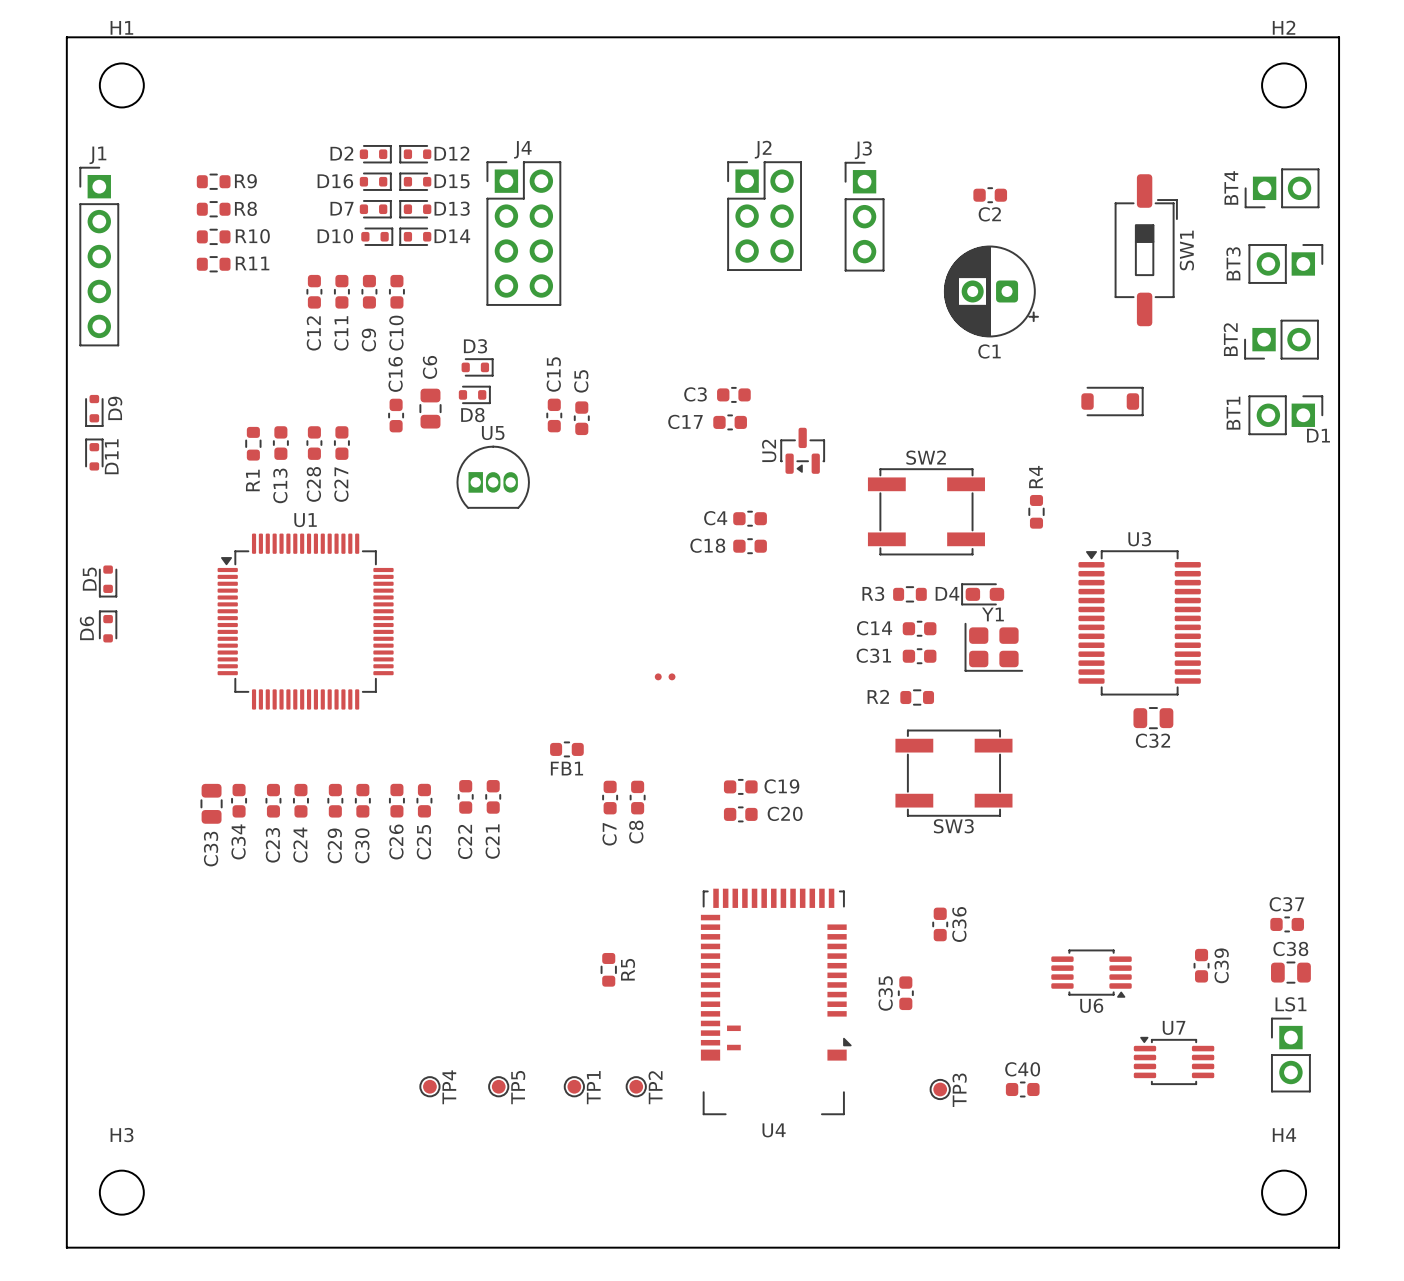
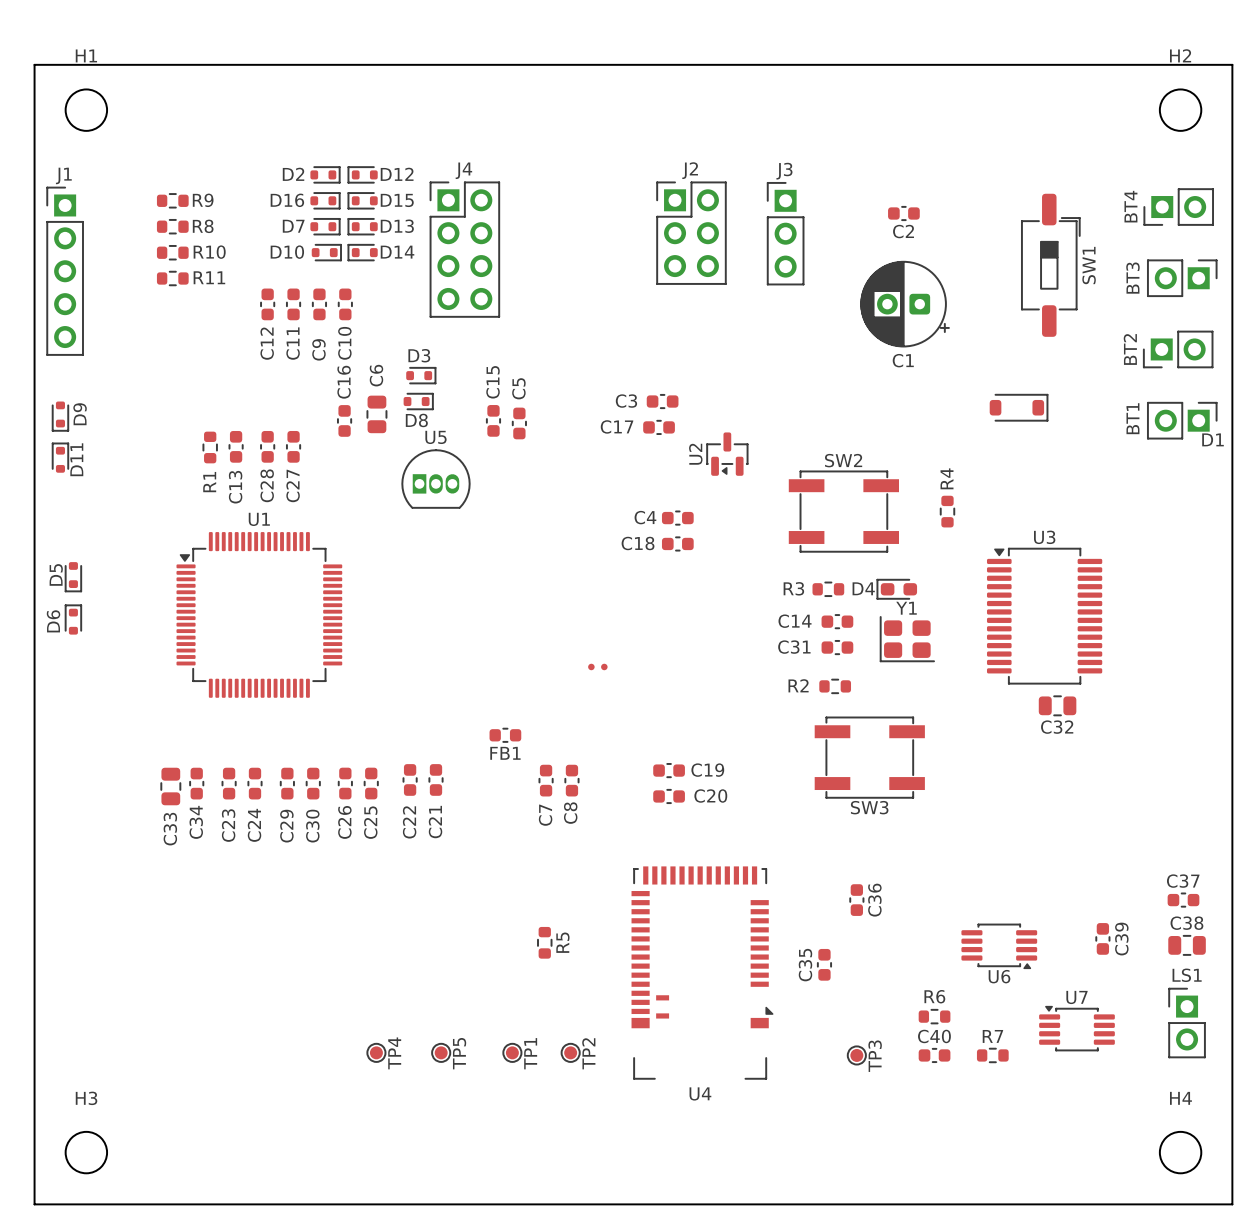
R6: none -> (934, 1016)
R7: none -> (992, 1055)

